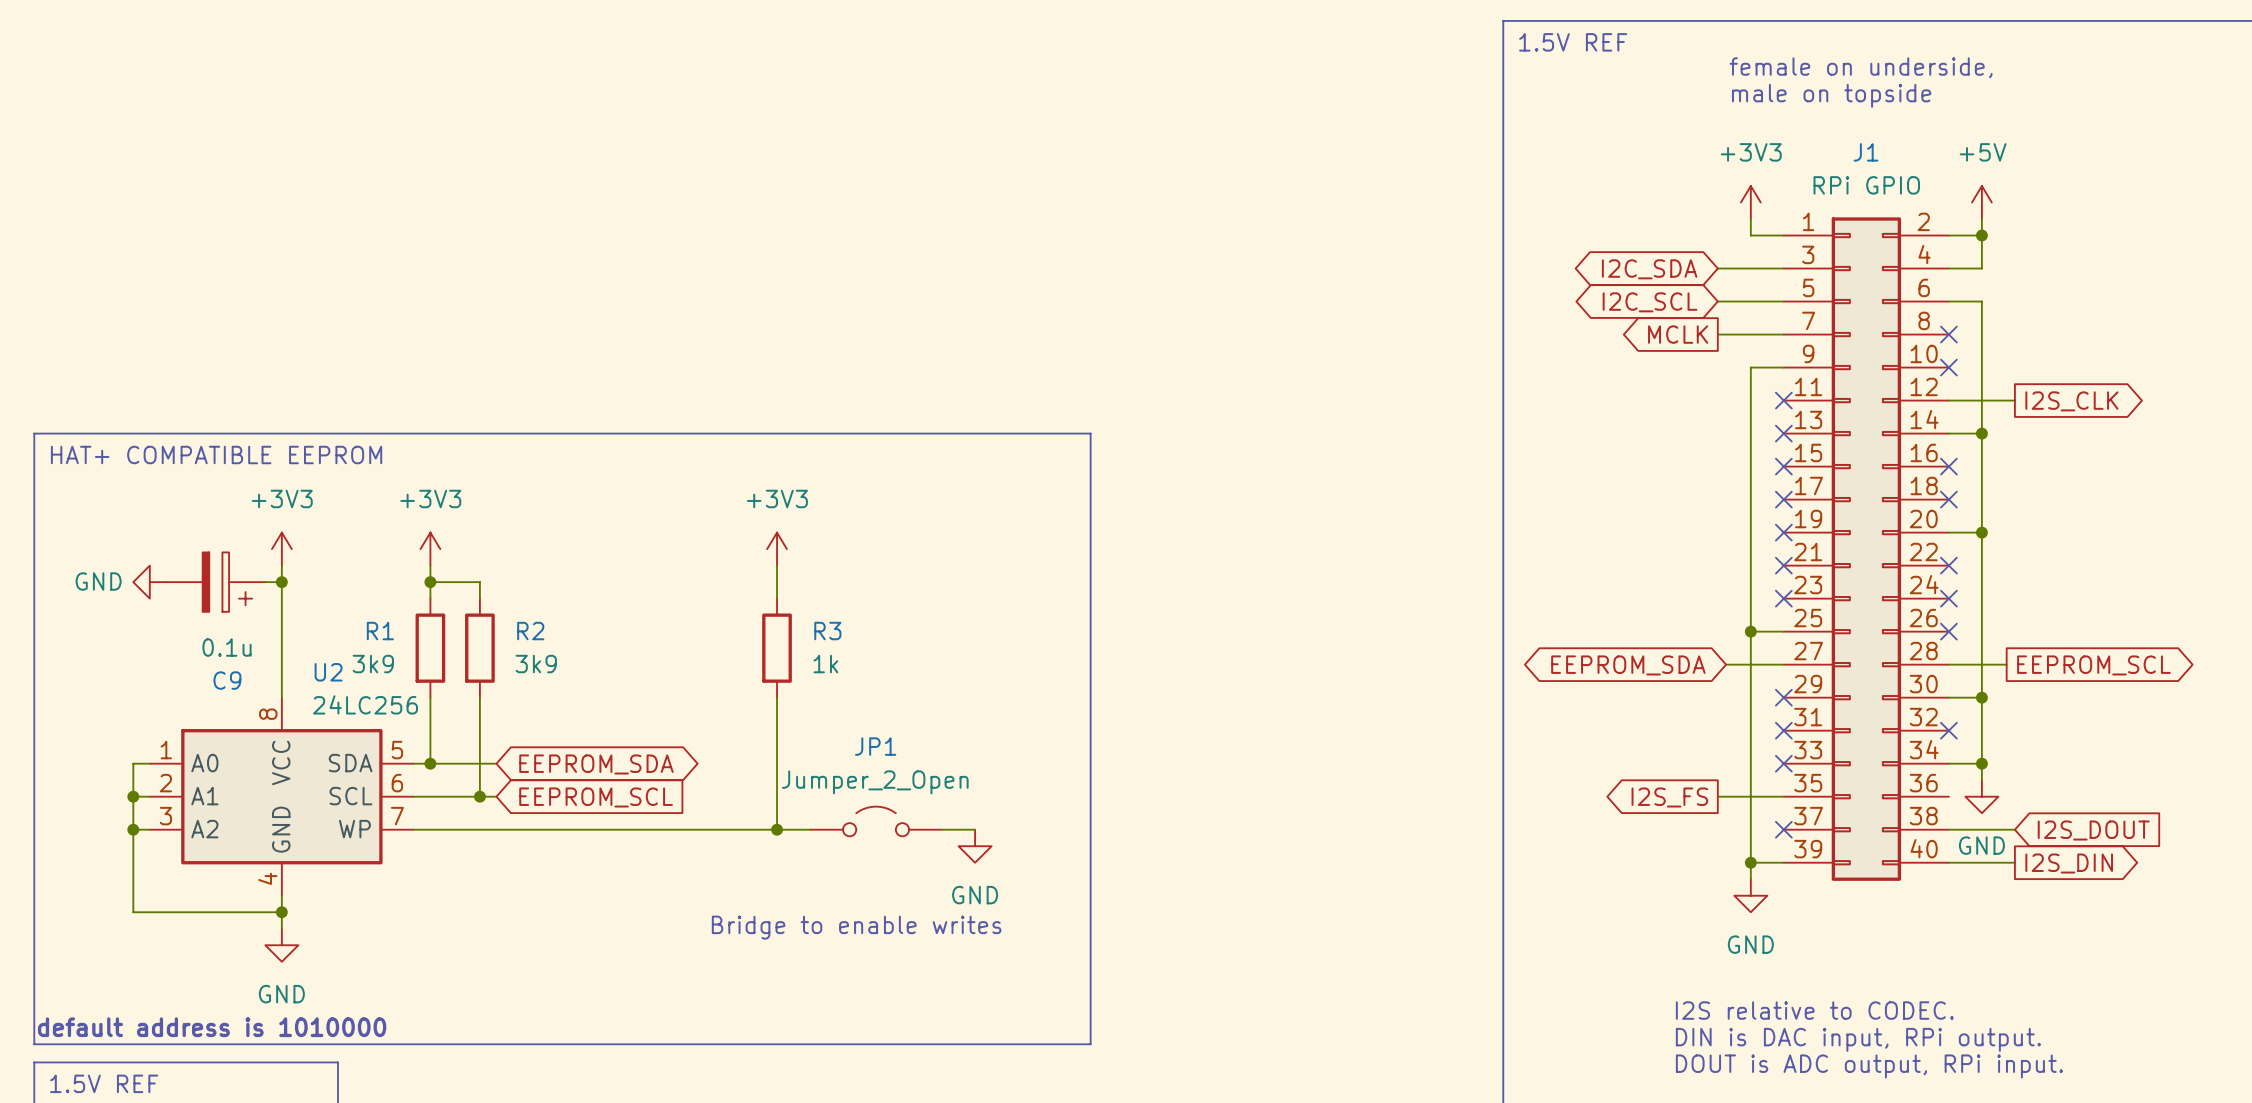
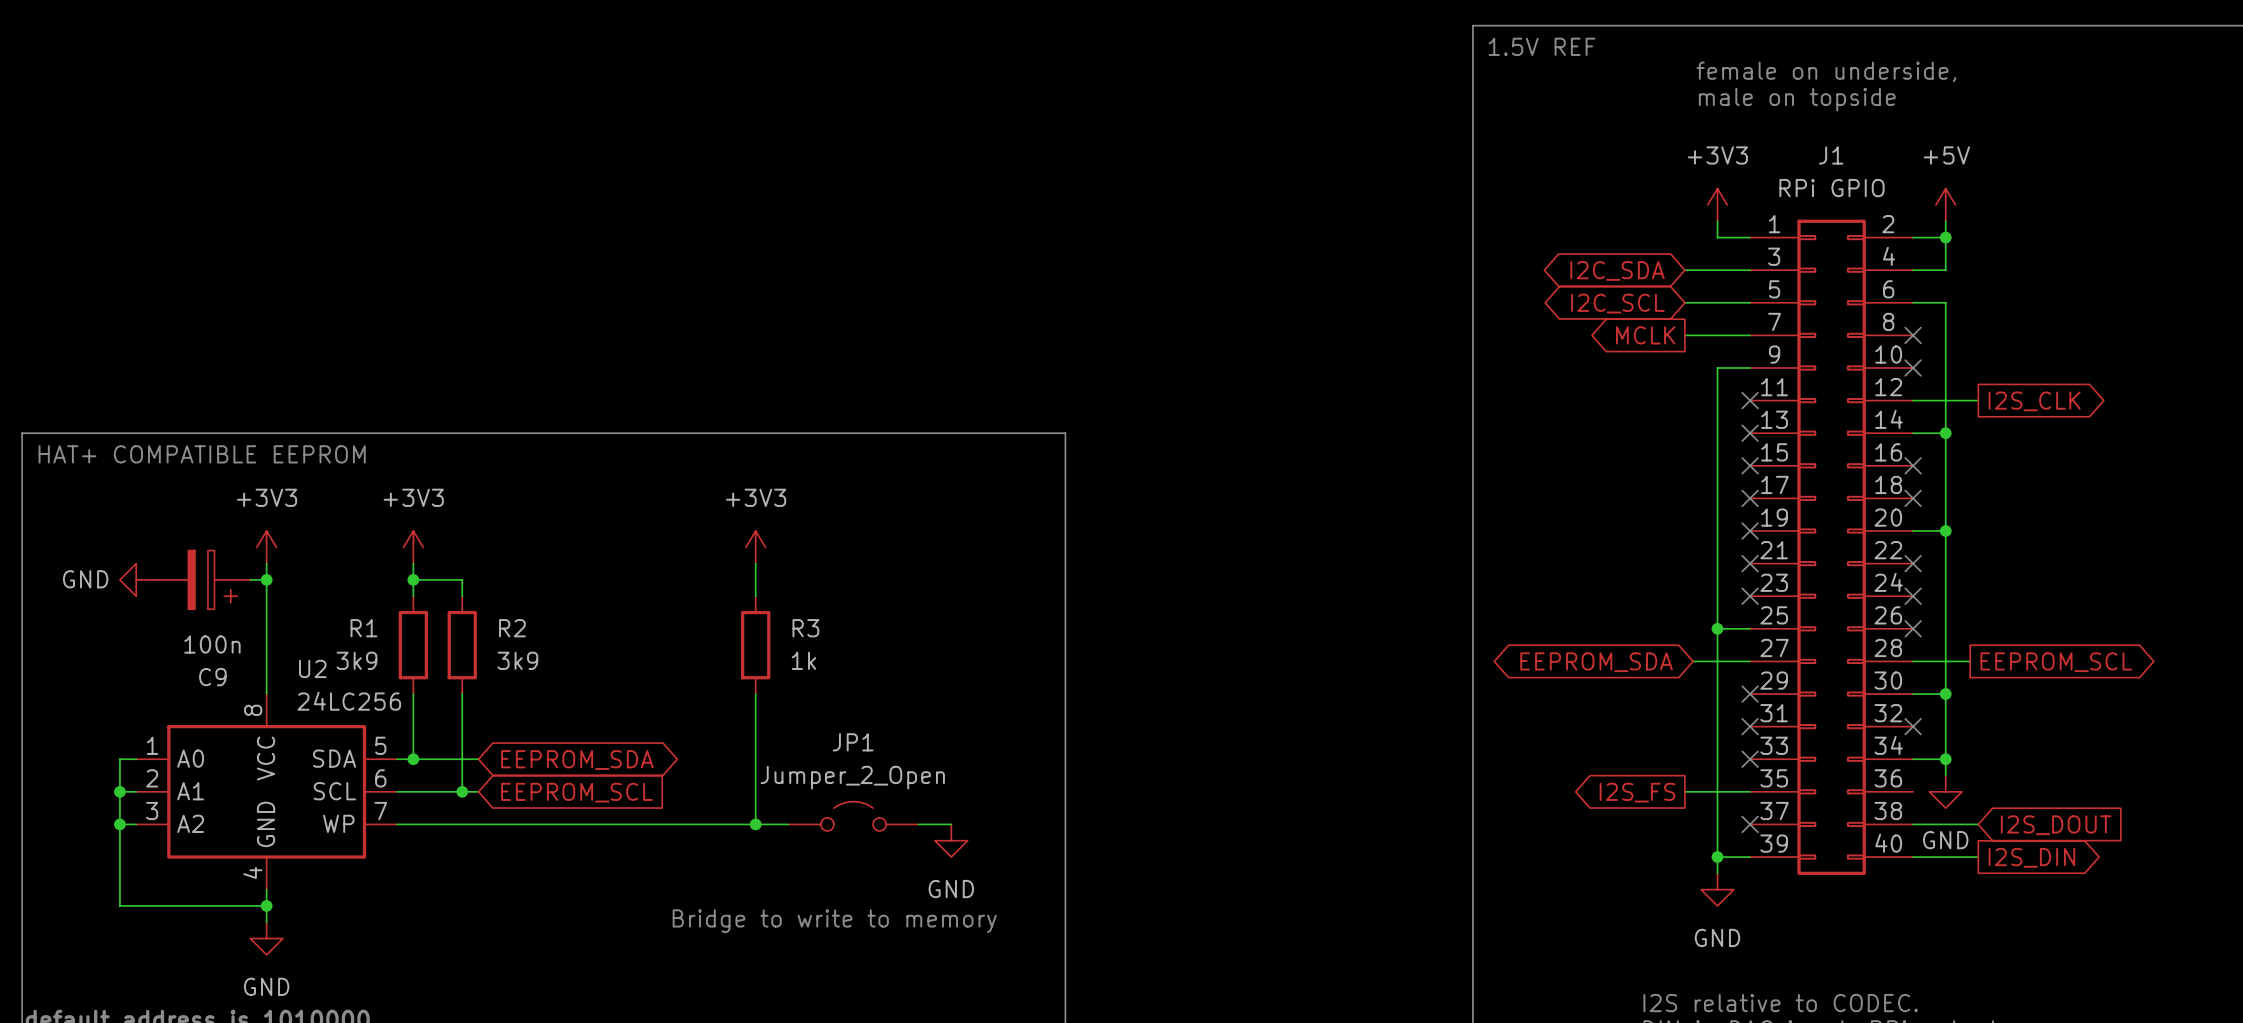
C9 value: 0.1u (227, 647) -> 100n (212, 644)
text: Bridge to enable writes (856, 927) -> Bridge to write to memory (834, 921)

